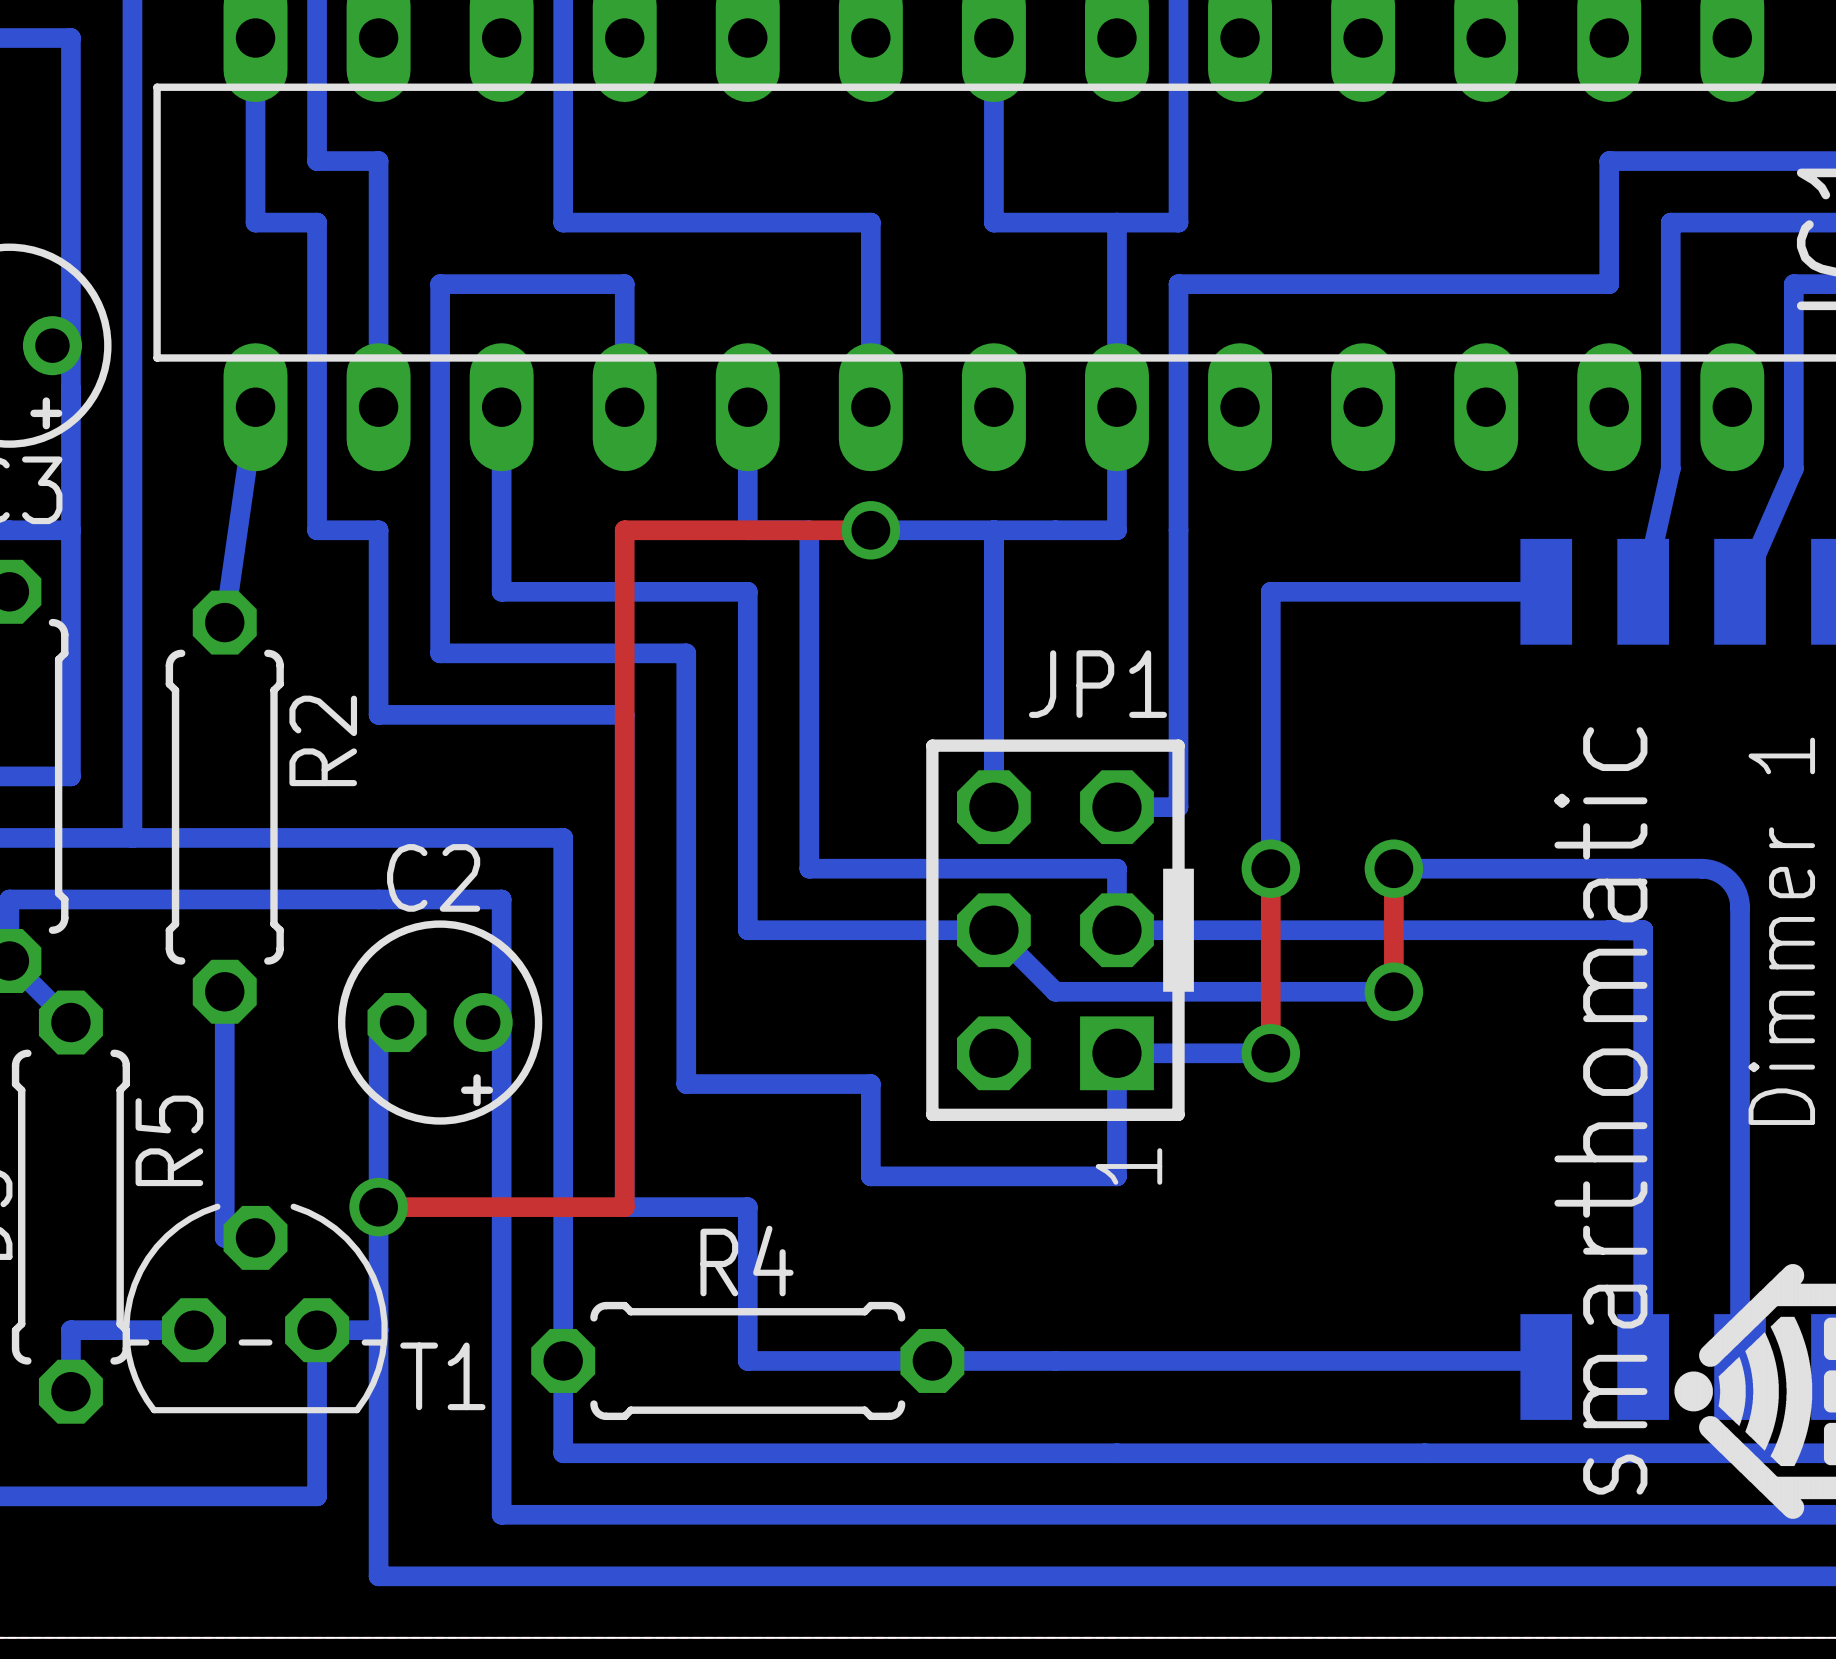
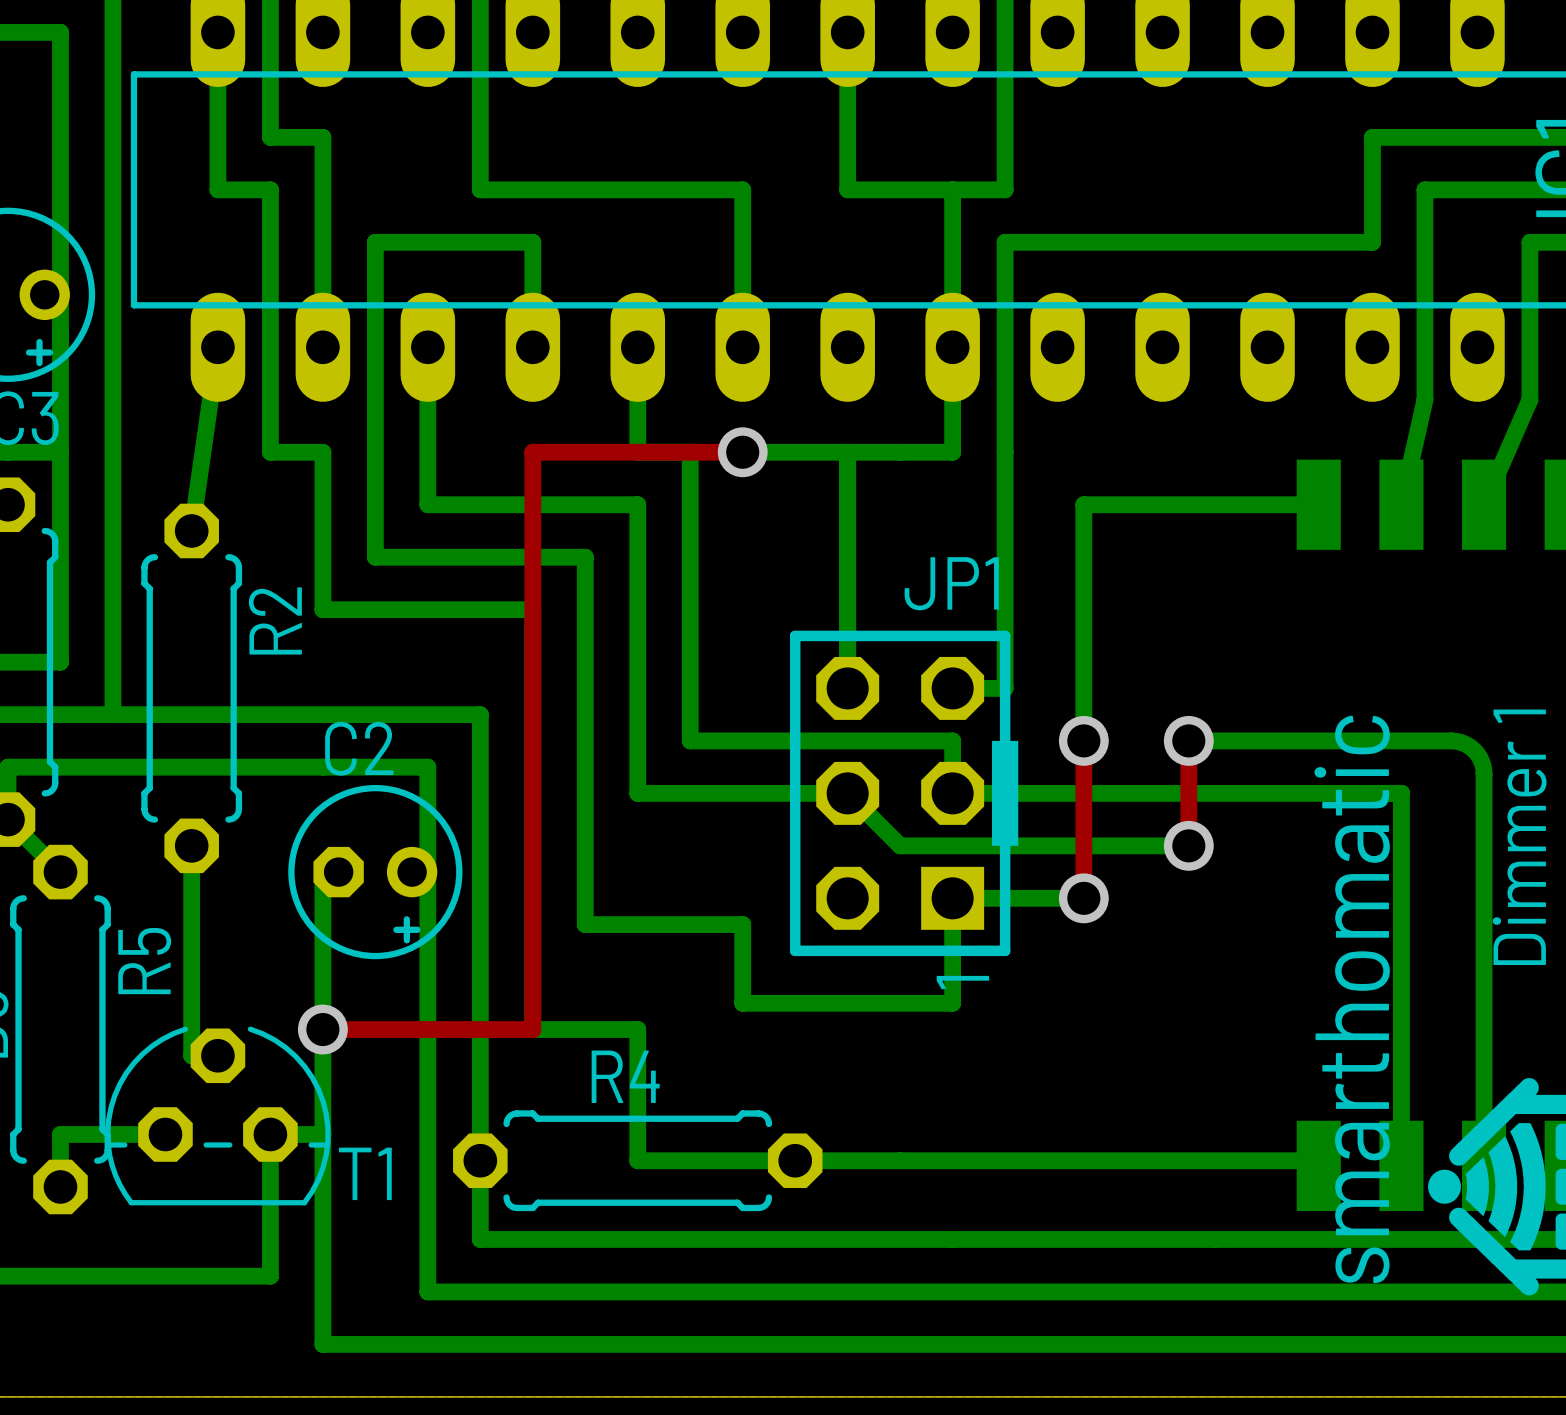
text position: smarthomatic (1600, 1110) -> smarthomatic (1352, 999)

